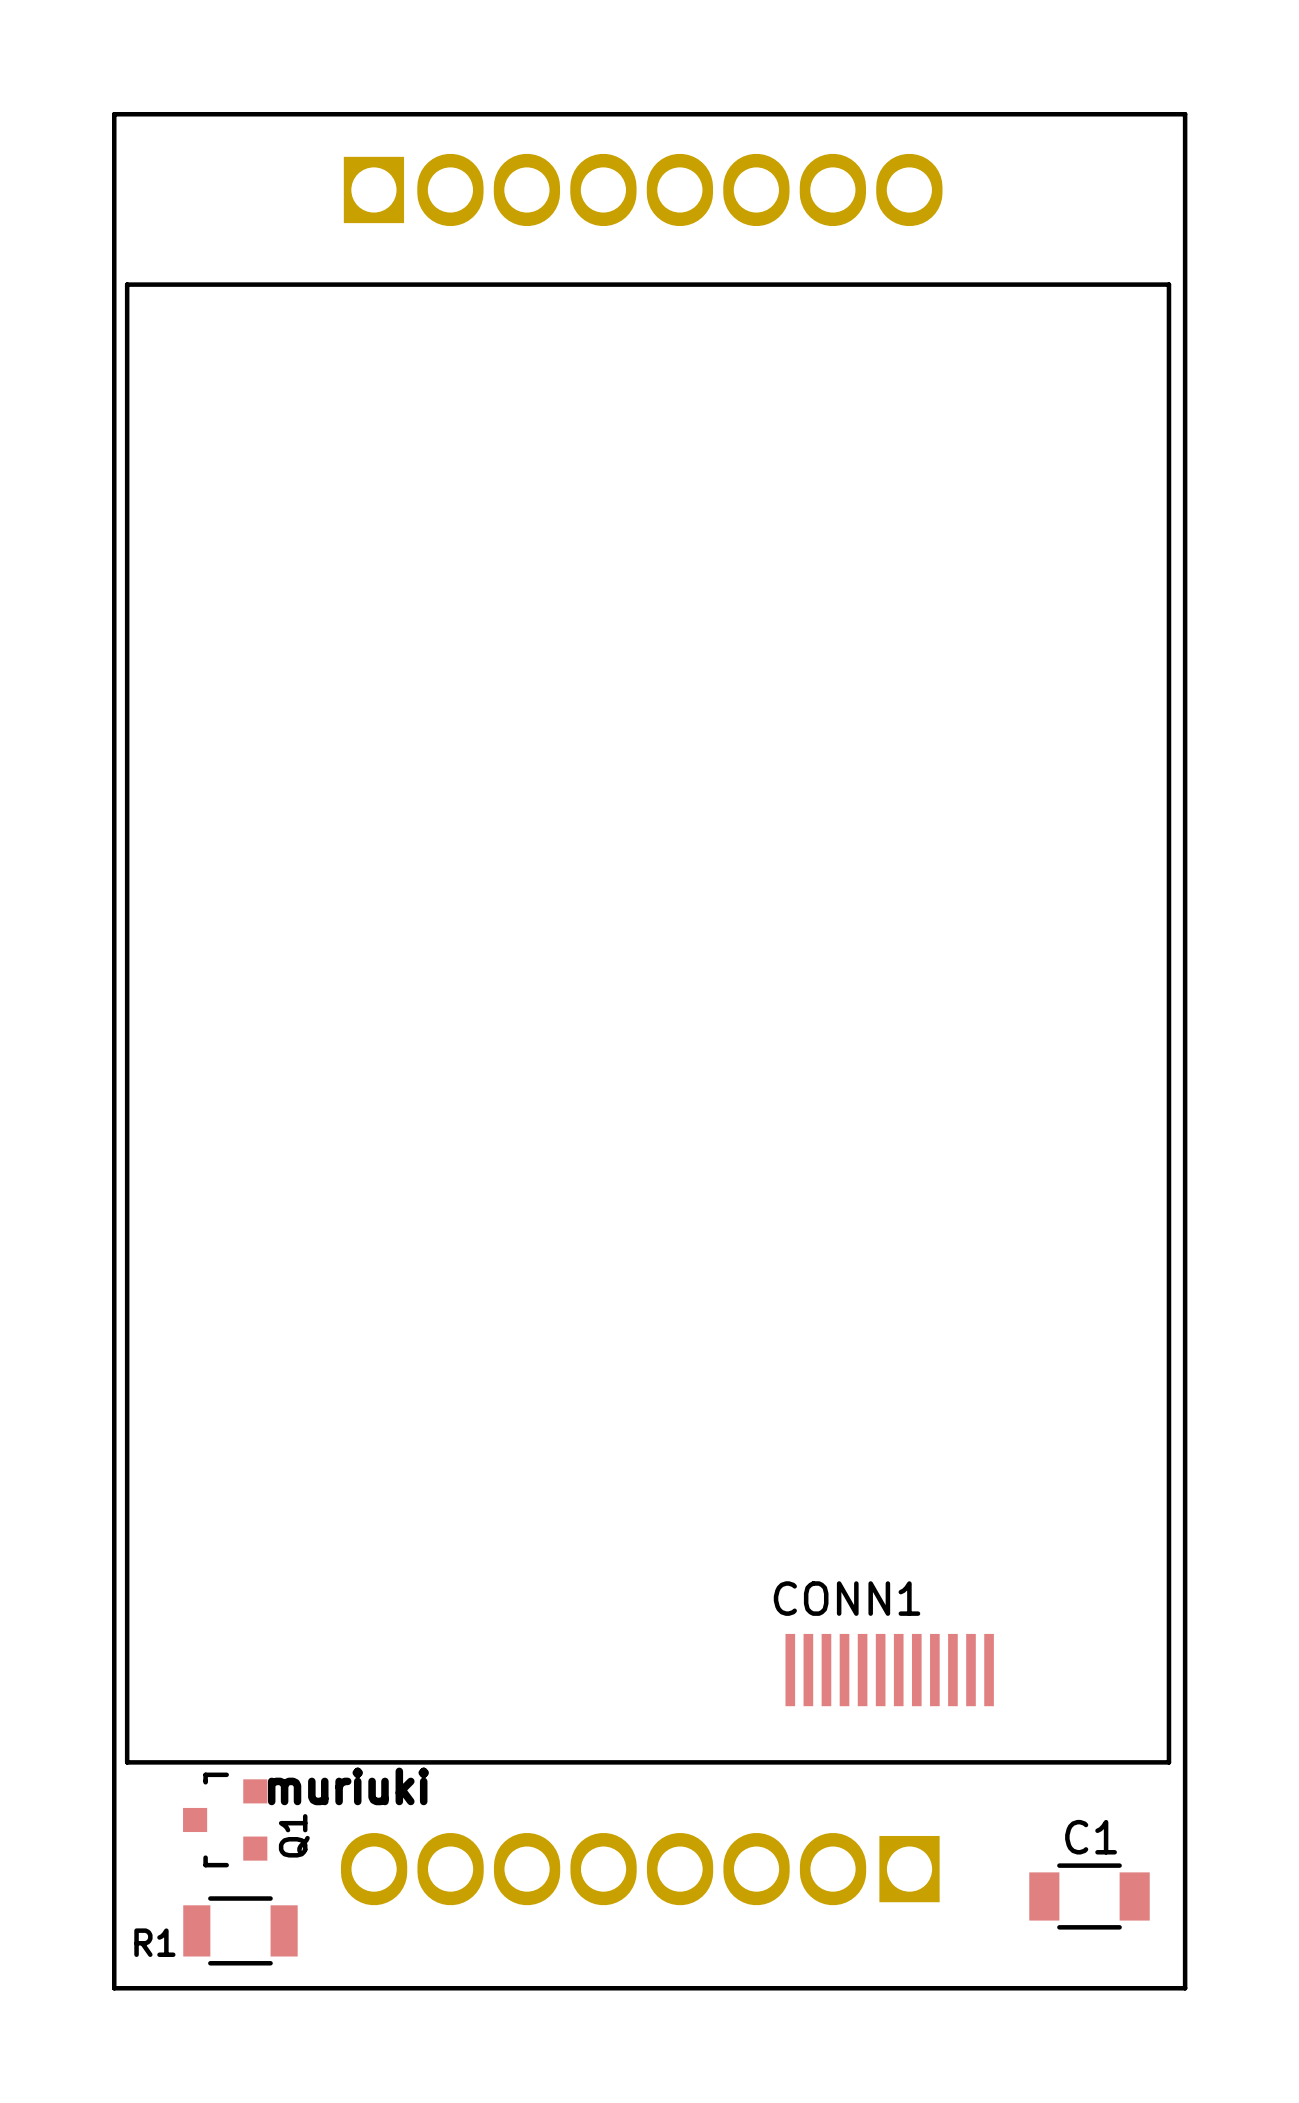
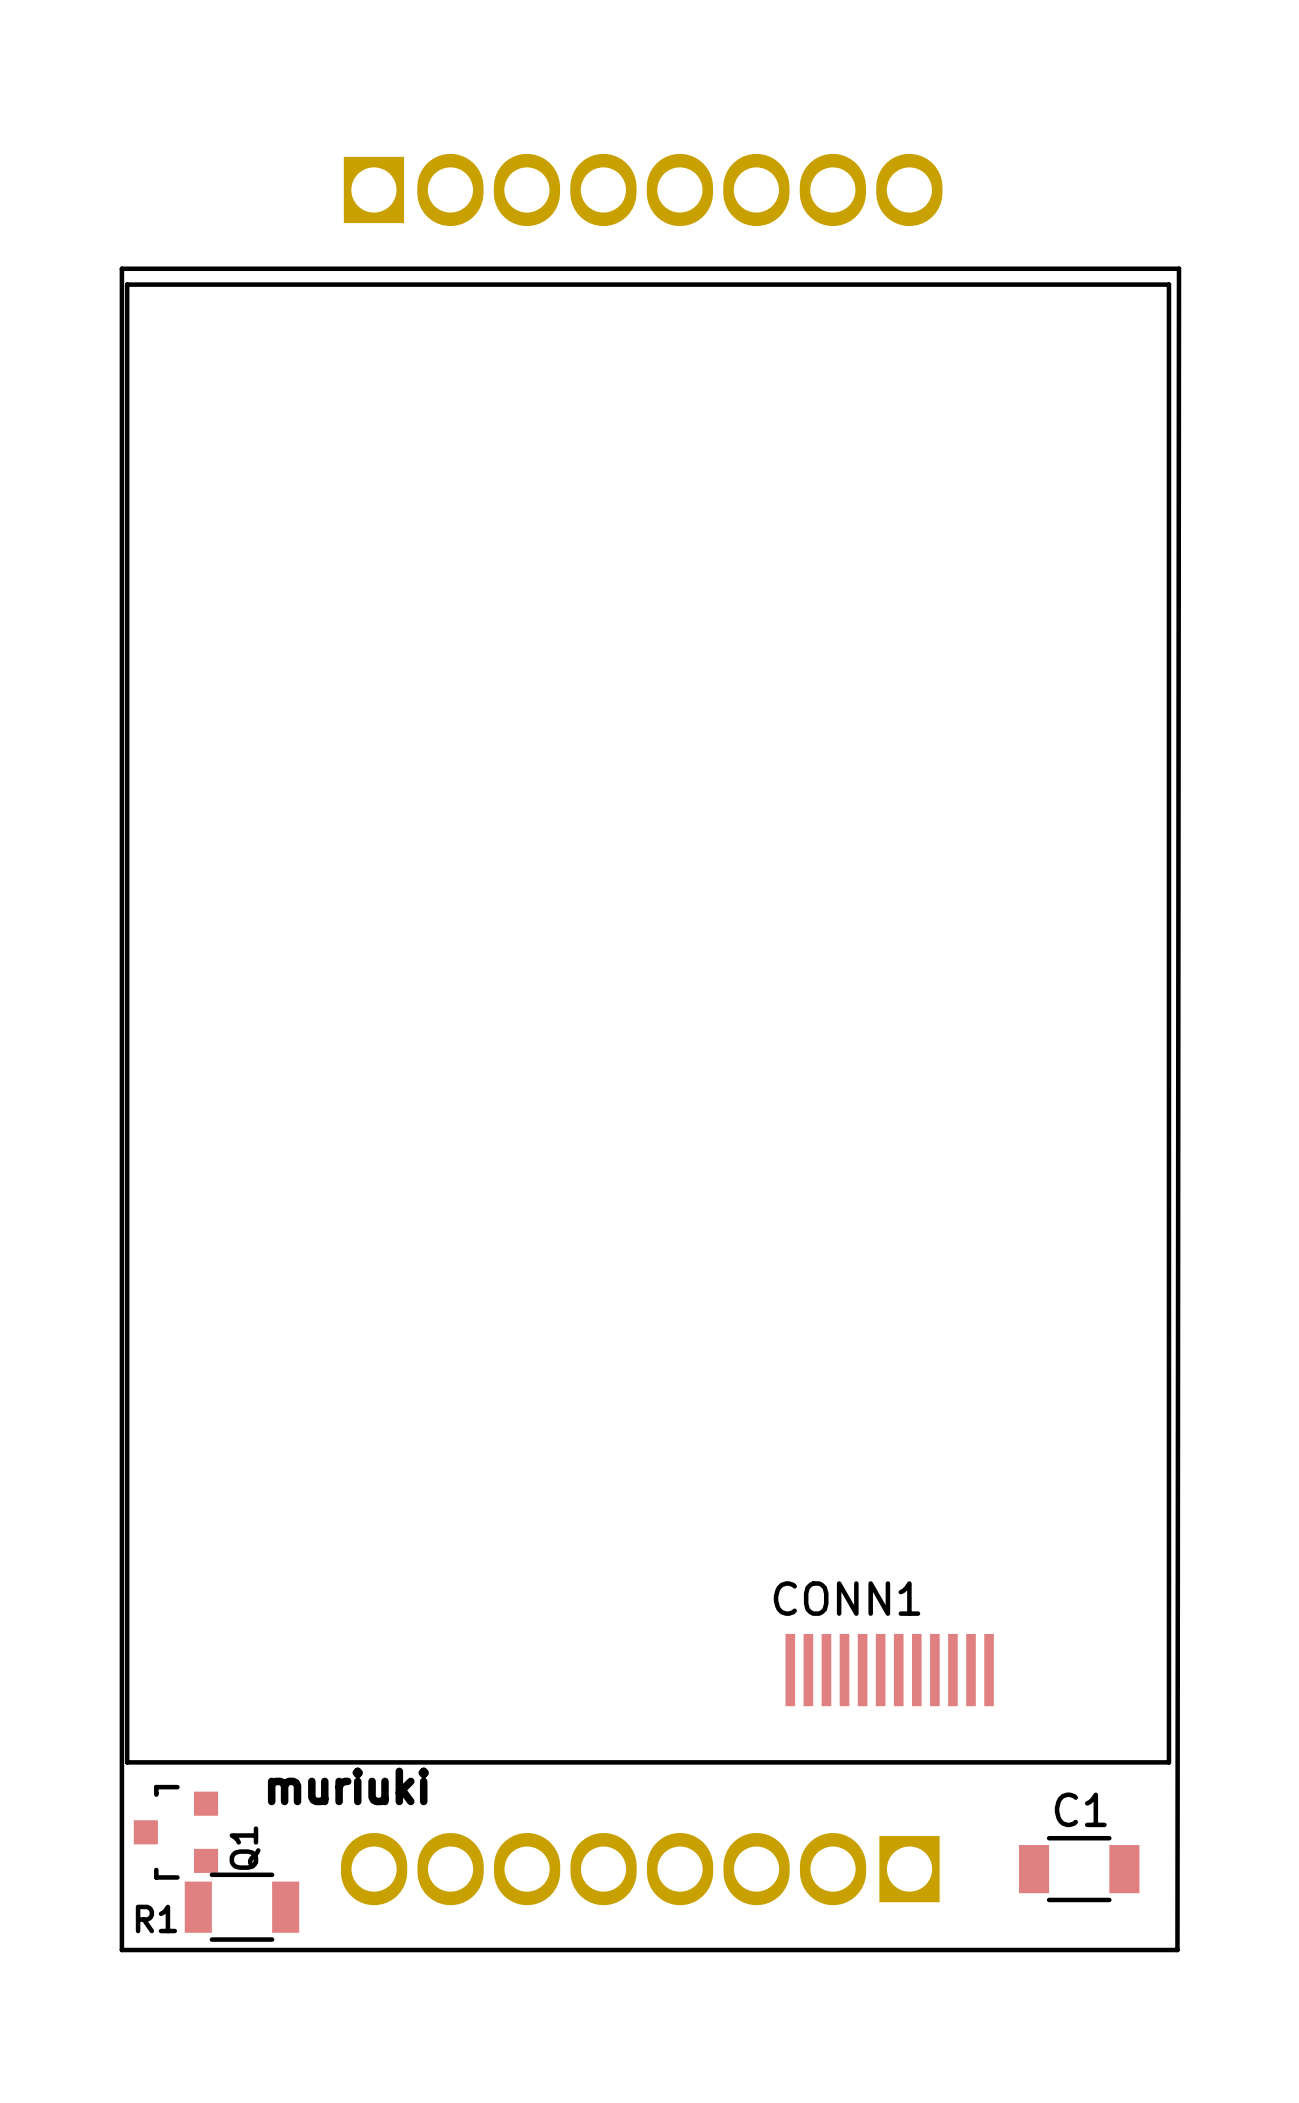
board edge: (114, 114) (1185, 114) (1185, 1988) (114, 1988) (114, 114) -> (121, 268) (121, 1950) (1177, 1950) (1178, 268) (121, 268)
Q1 position: (225, 1819) -> (175, 1832)
C1 position: (1089, 1896) -> (1079, 1869)
R1 position: (240, 1930) -> (241, 1907)

